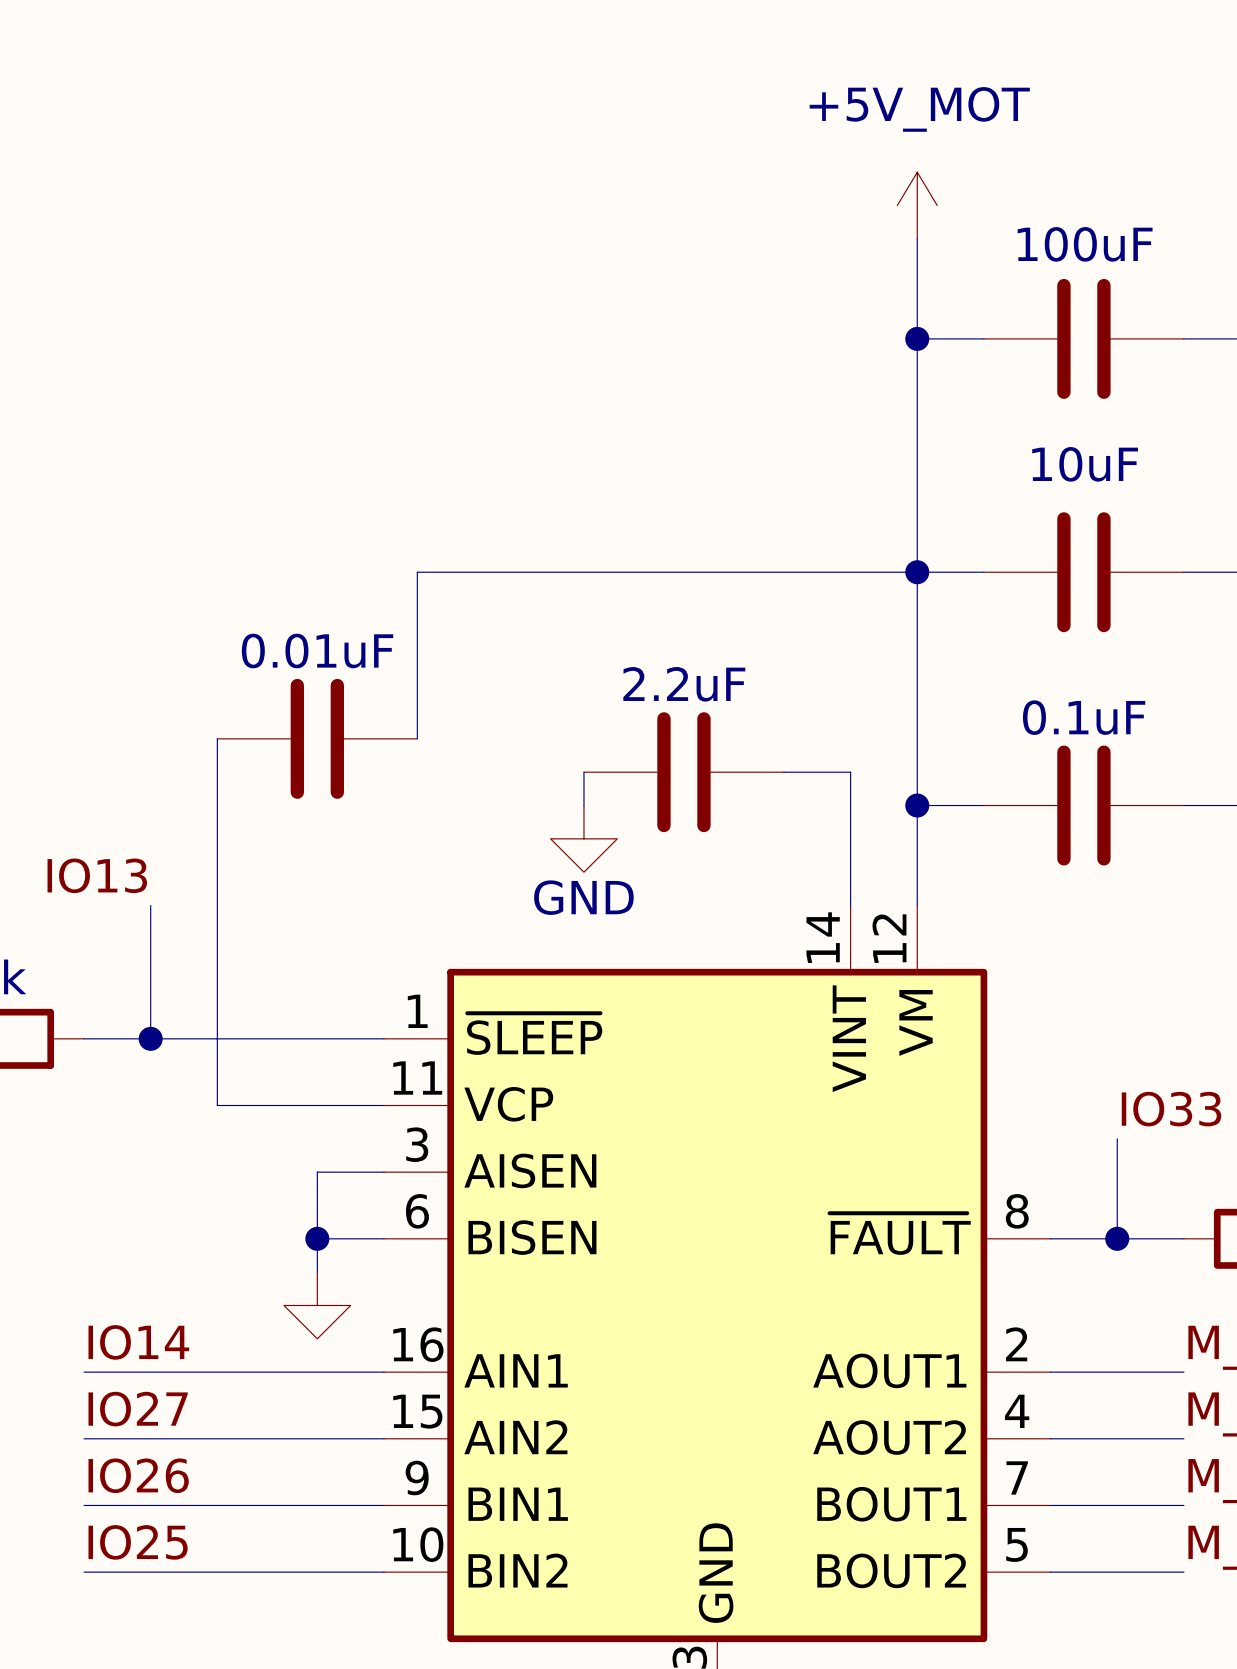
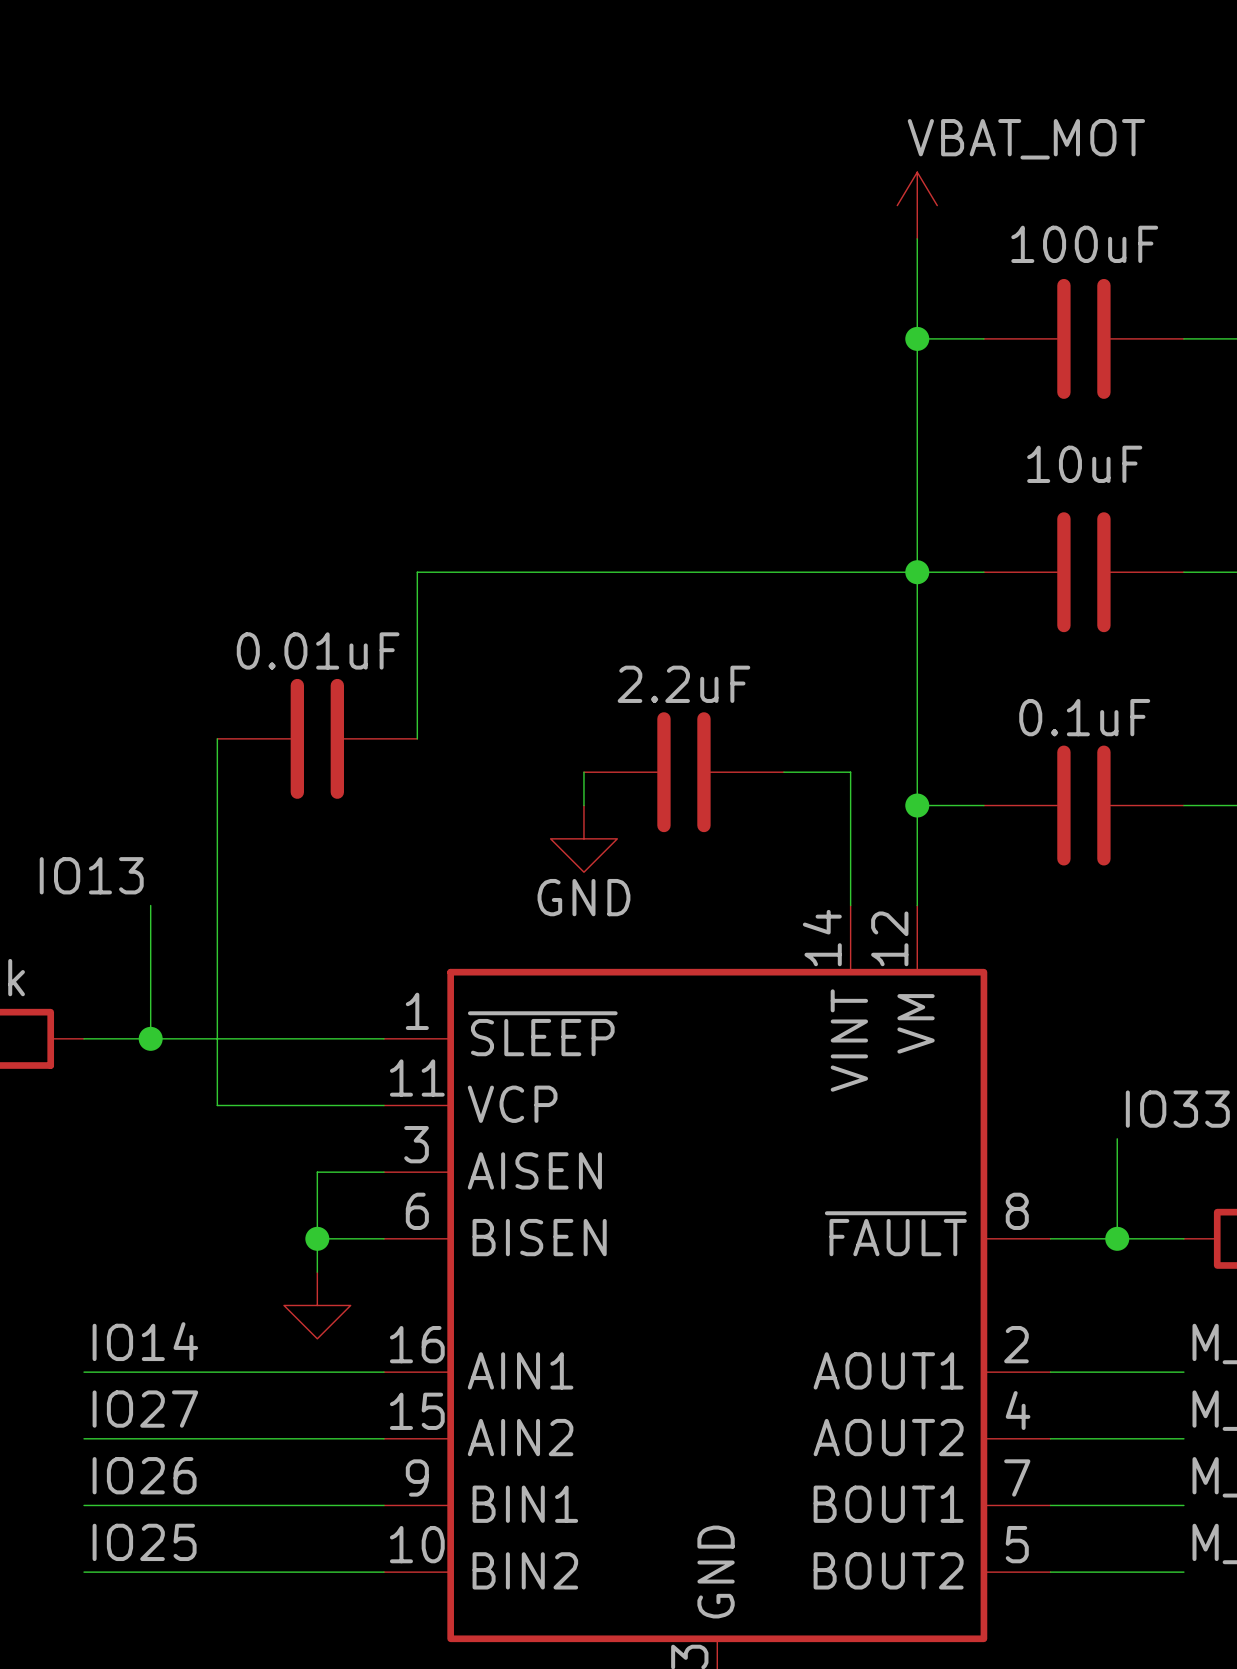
power symbol: +5V_MOT (917, 205) -> VBAT_MOT (917, 205)

